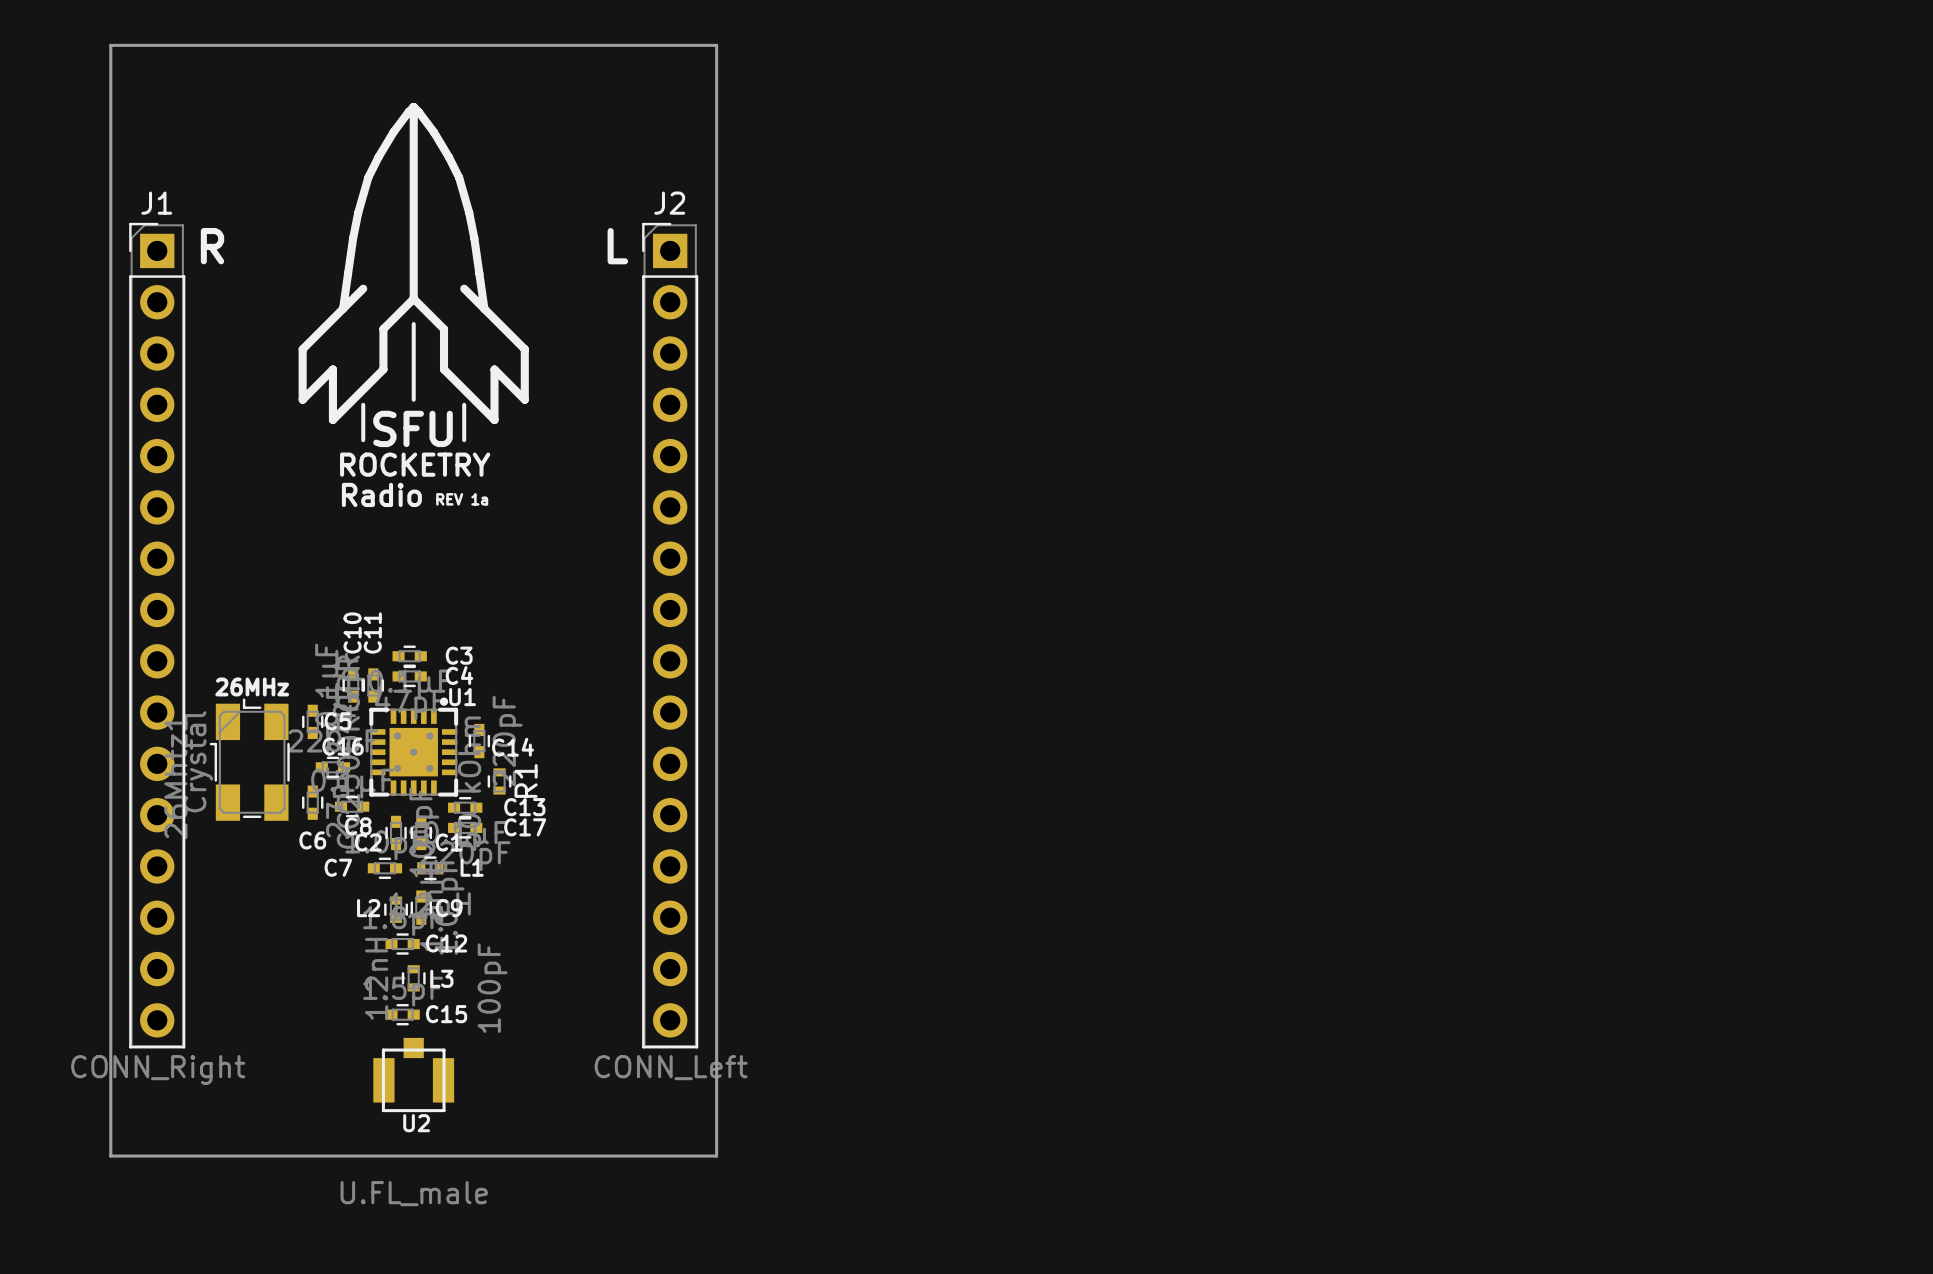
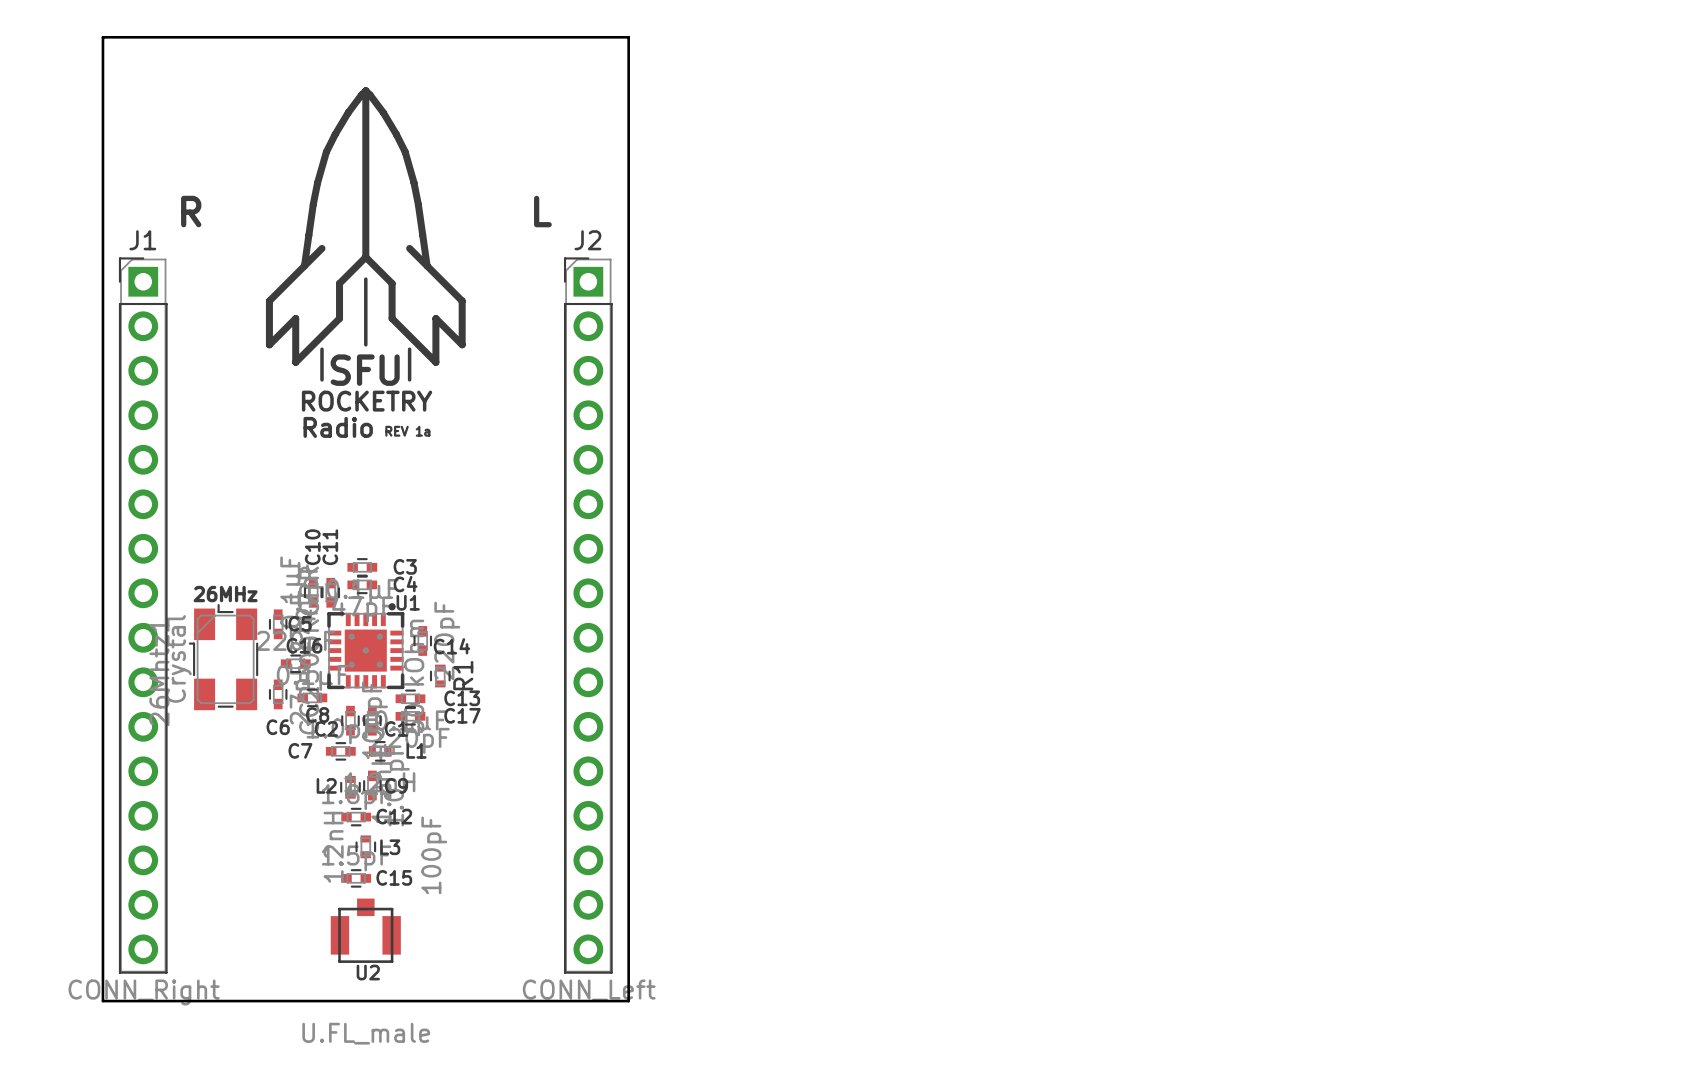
J1 position: (157, 635) -> (143, 615)
J2 position: (670, 635) -> (588, 615)

